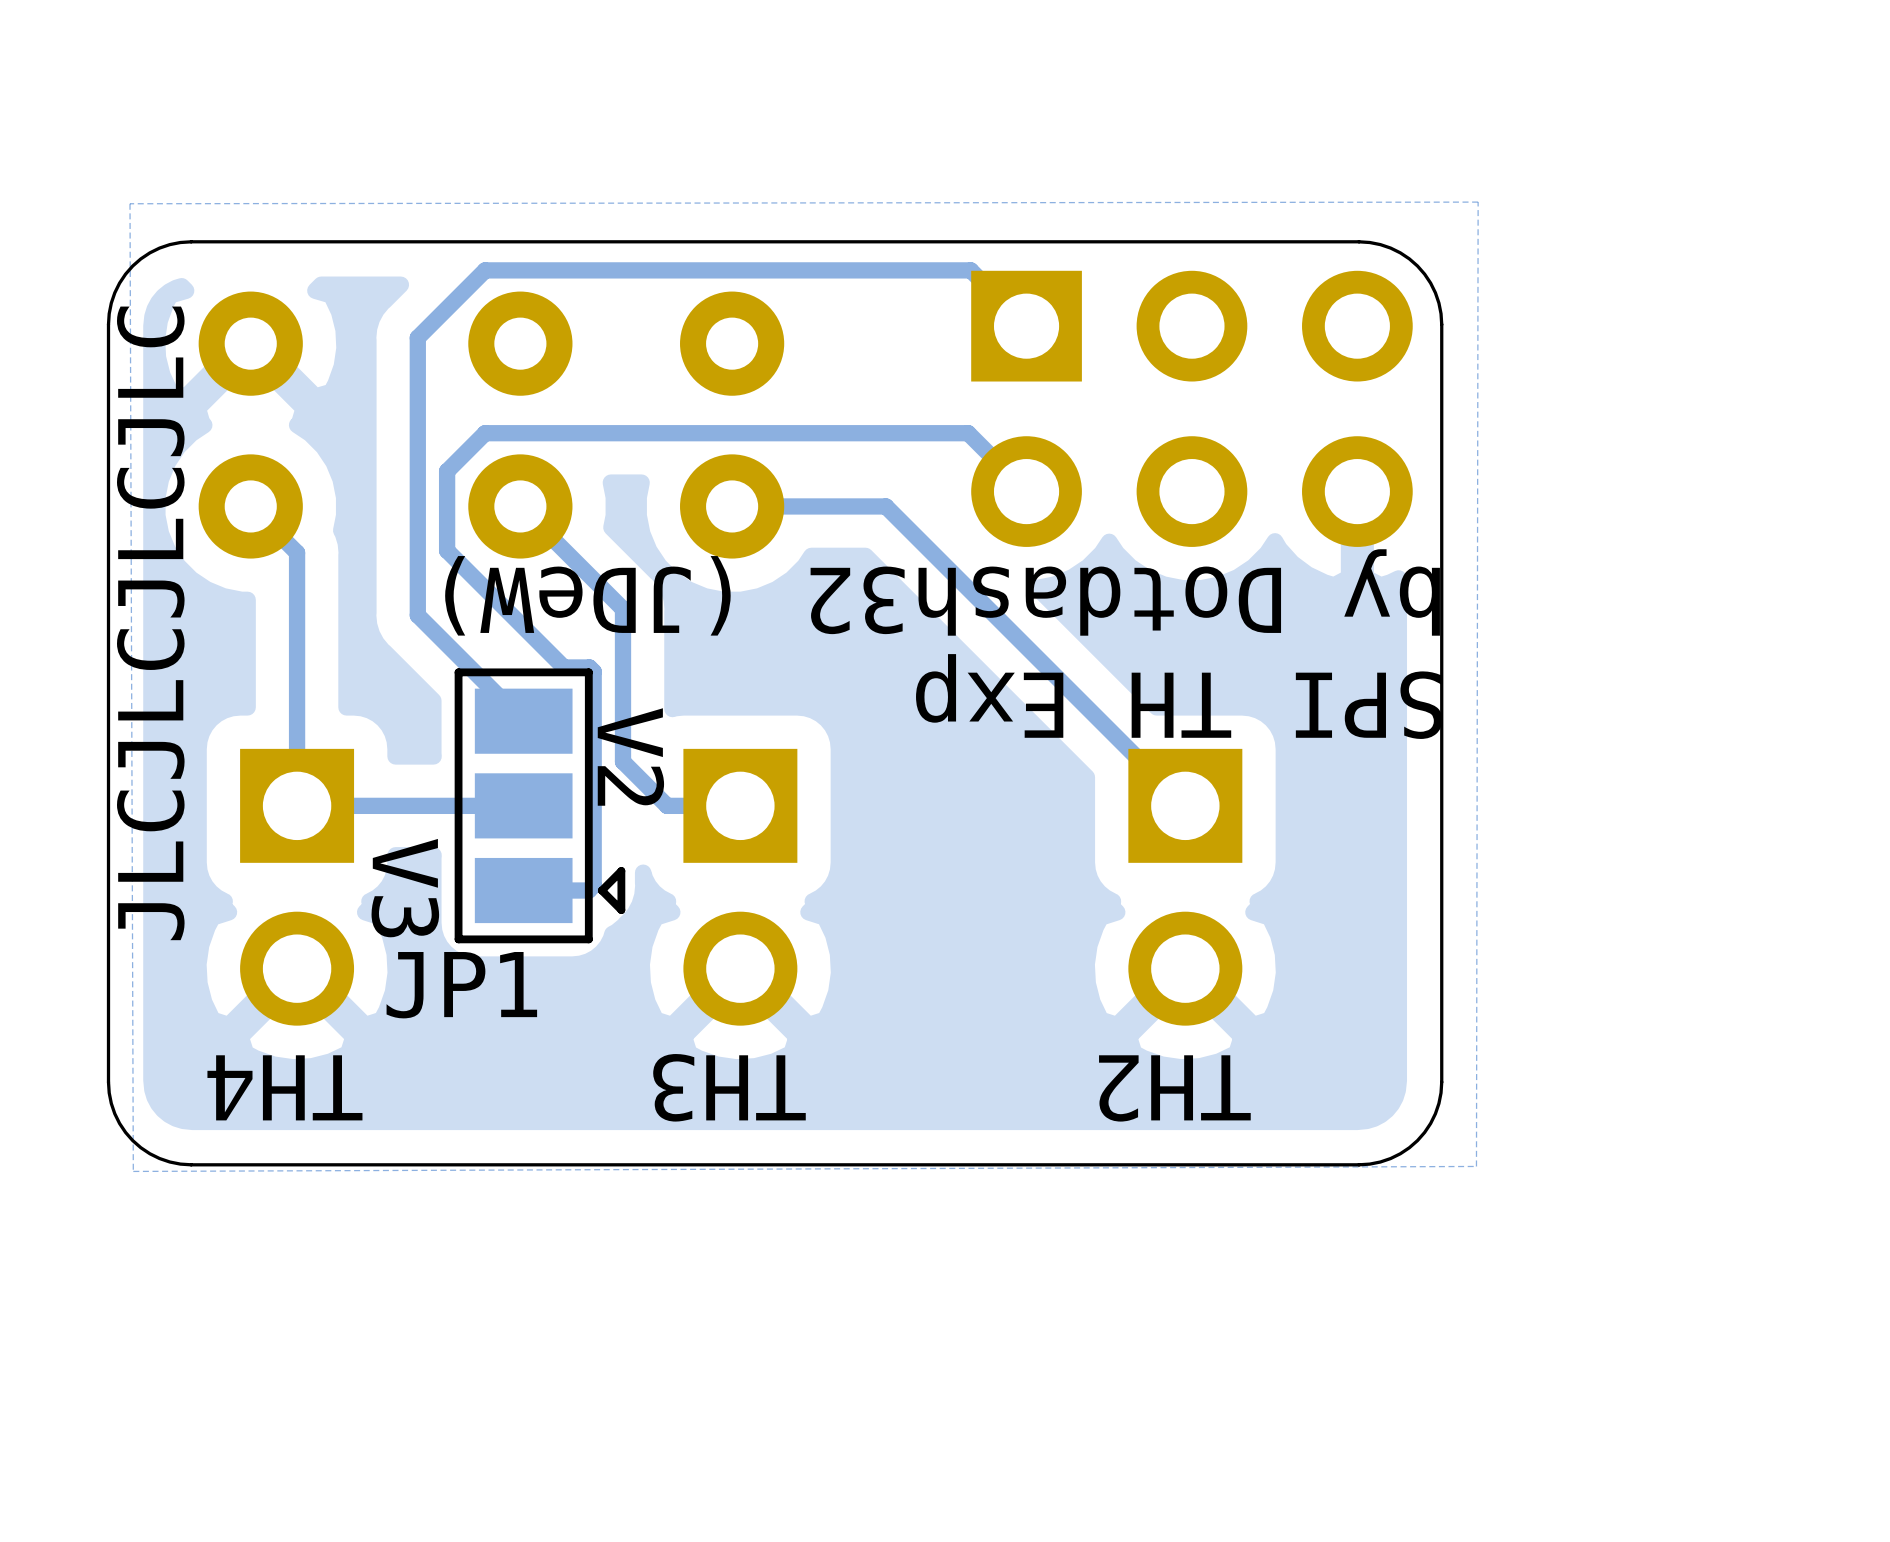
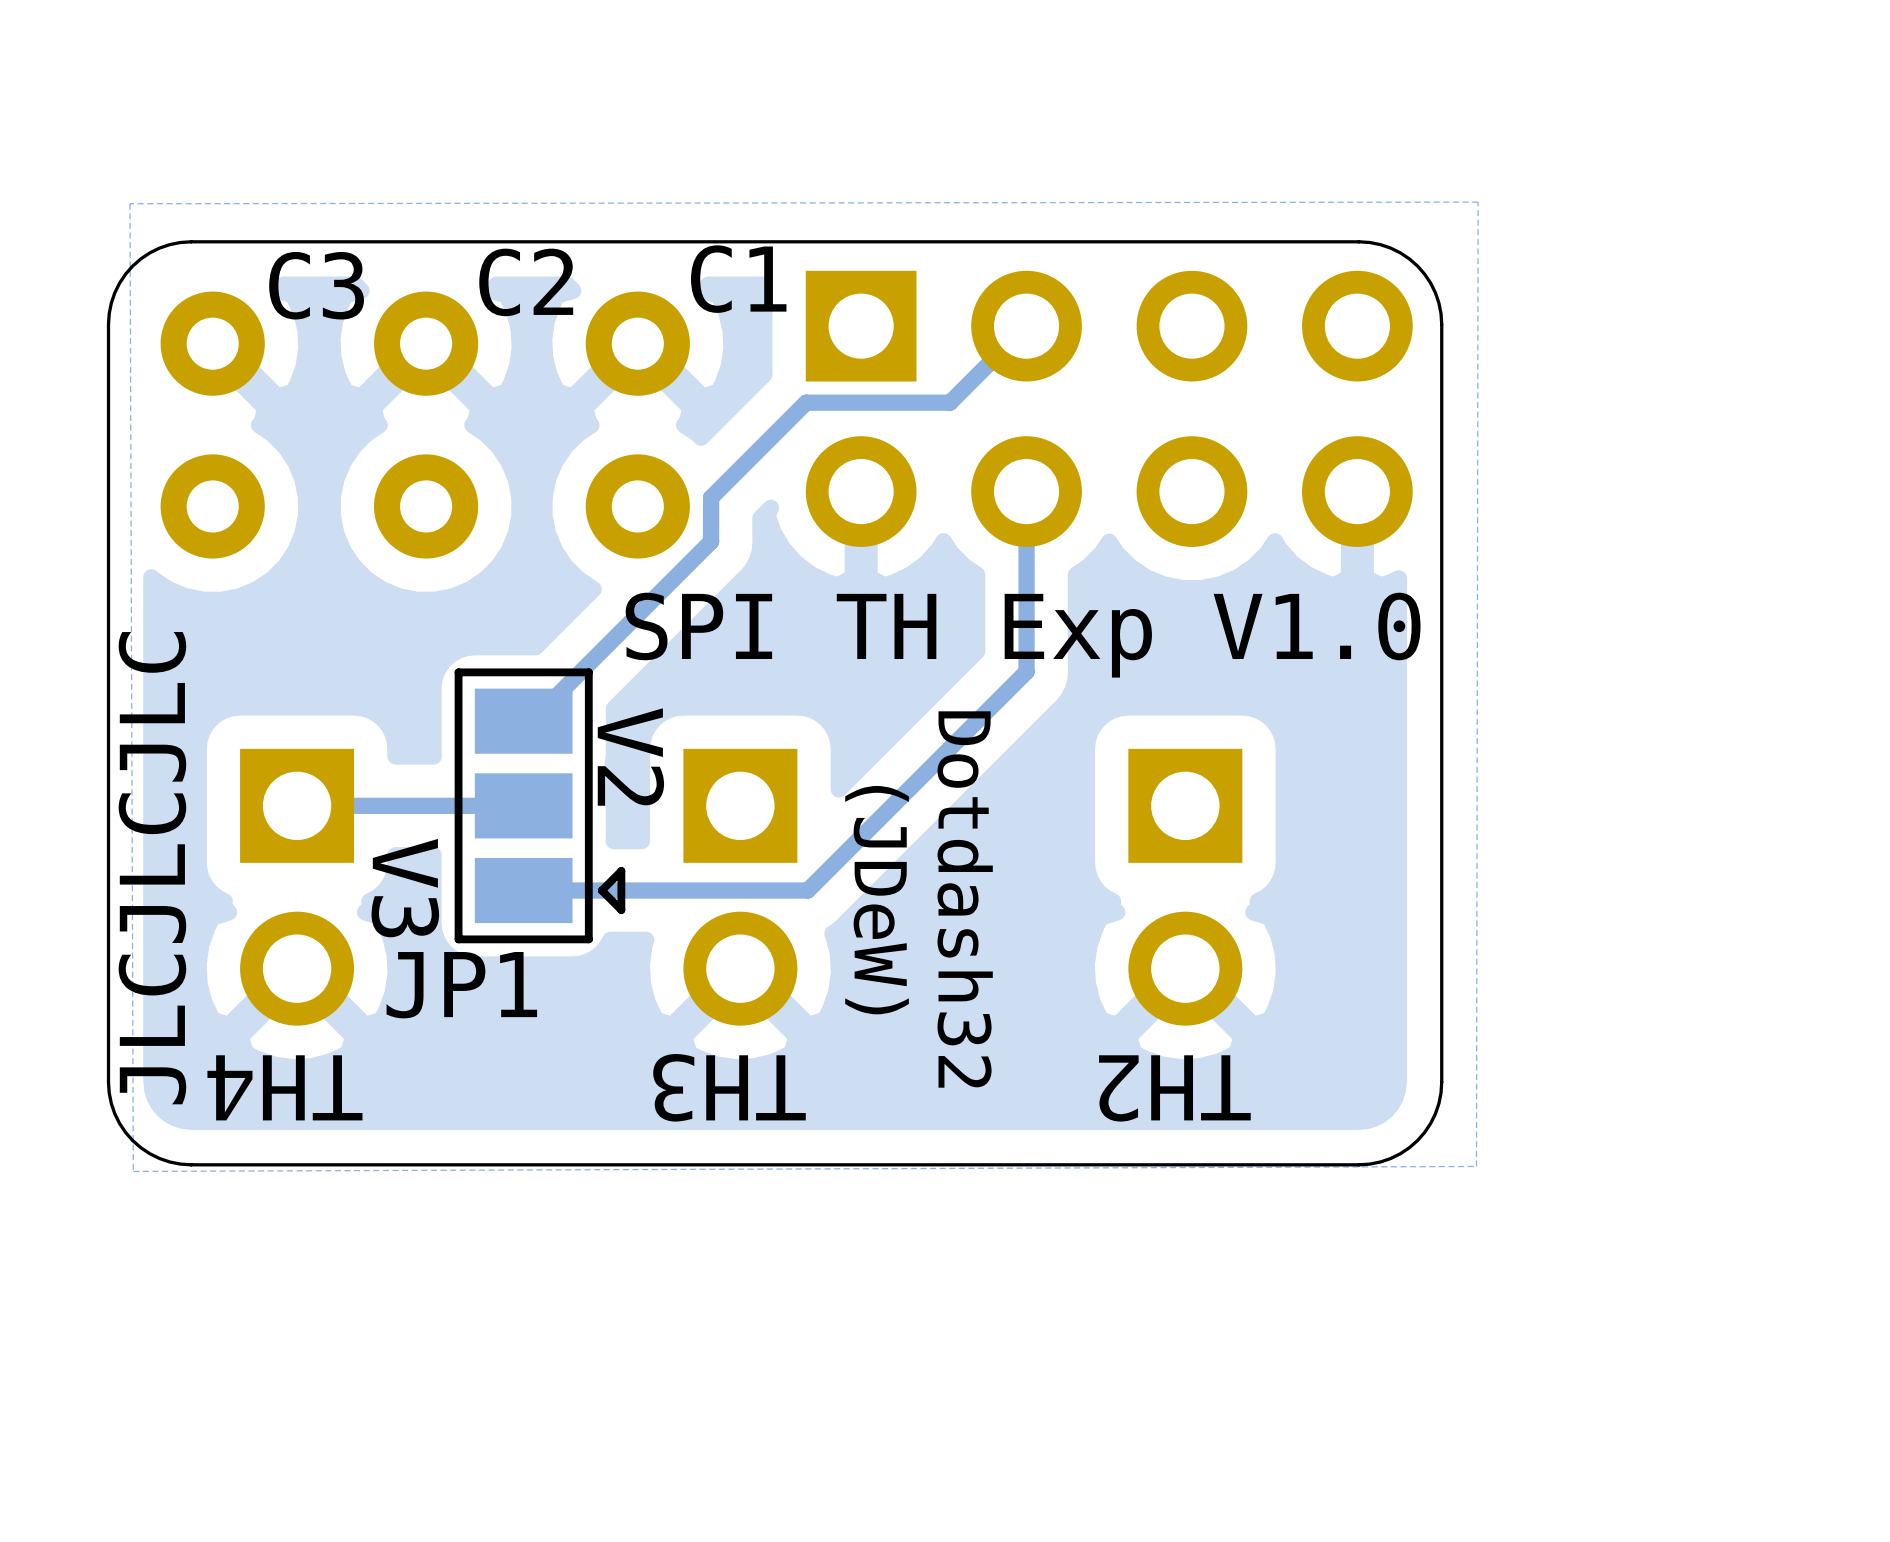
C3 name: none -> C3 (316, 285)
track: (1026, 326) (970, 270) (485, 270) (417, 337) (417, 615) (523, 721) -> (1026, 326) (950, 402) (806, 402) (711, 497) (711, 541) (531, 721) (523, 721)
part: none -> (1109, 408)
part: (1191, 408) -> none
C3 position: (250, 425) -> (212, 425)
C2: none -> (426, 425)
part: (520, 425) -> none
C1: none -> (637, 425)
part: (732, 425) -> none
track: (1026, 491) (968, 433) (485, 433) (447, 471) (447, 550) (563, 667) (589, 667) (593, 671) (593, 885) (588, 890) -> (1026, 491) (1026, 671) (807, 890) (588, 890)
track: (250, 506) (297, 552) (297, 805) -> none
track: (520, 506) (623, 609) (623, 761) (667, 805) (740, 805) -> none
track: (732, 506) (885, 506) (1185, 805) -> none
text: by Dotdash32 (JDeW) (942, 592) -> Dotdash32 (965, 899)
text: JLCJLCJLCJLC (150, 623) -> JLCJLCJLC (152, 868)
text: SPI TH Exp (1179, 696) -> SPI TH Exp V1.0 (1023, 635)
text: none -> (JDeW) (877, 900)

